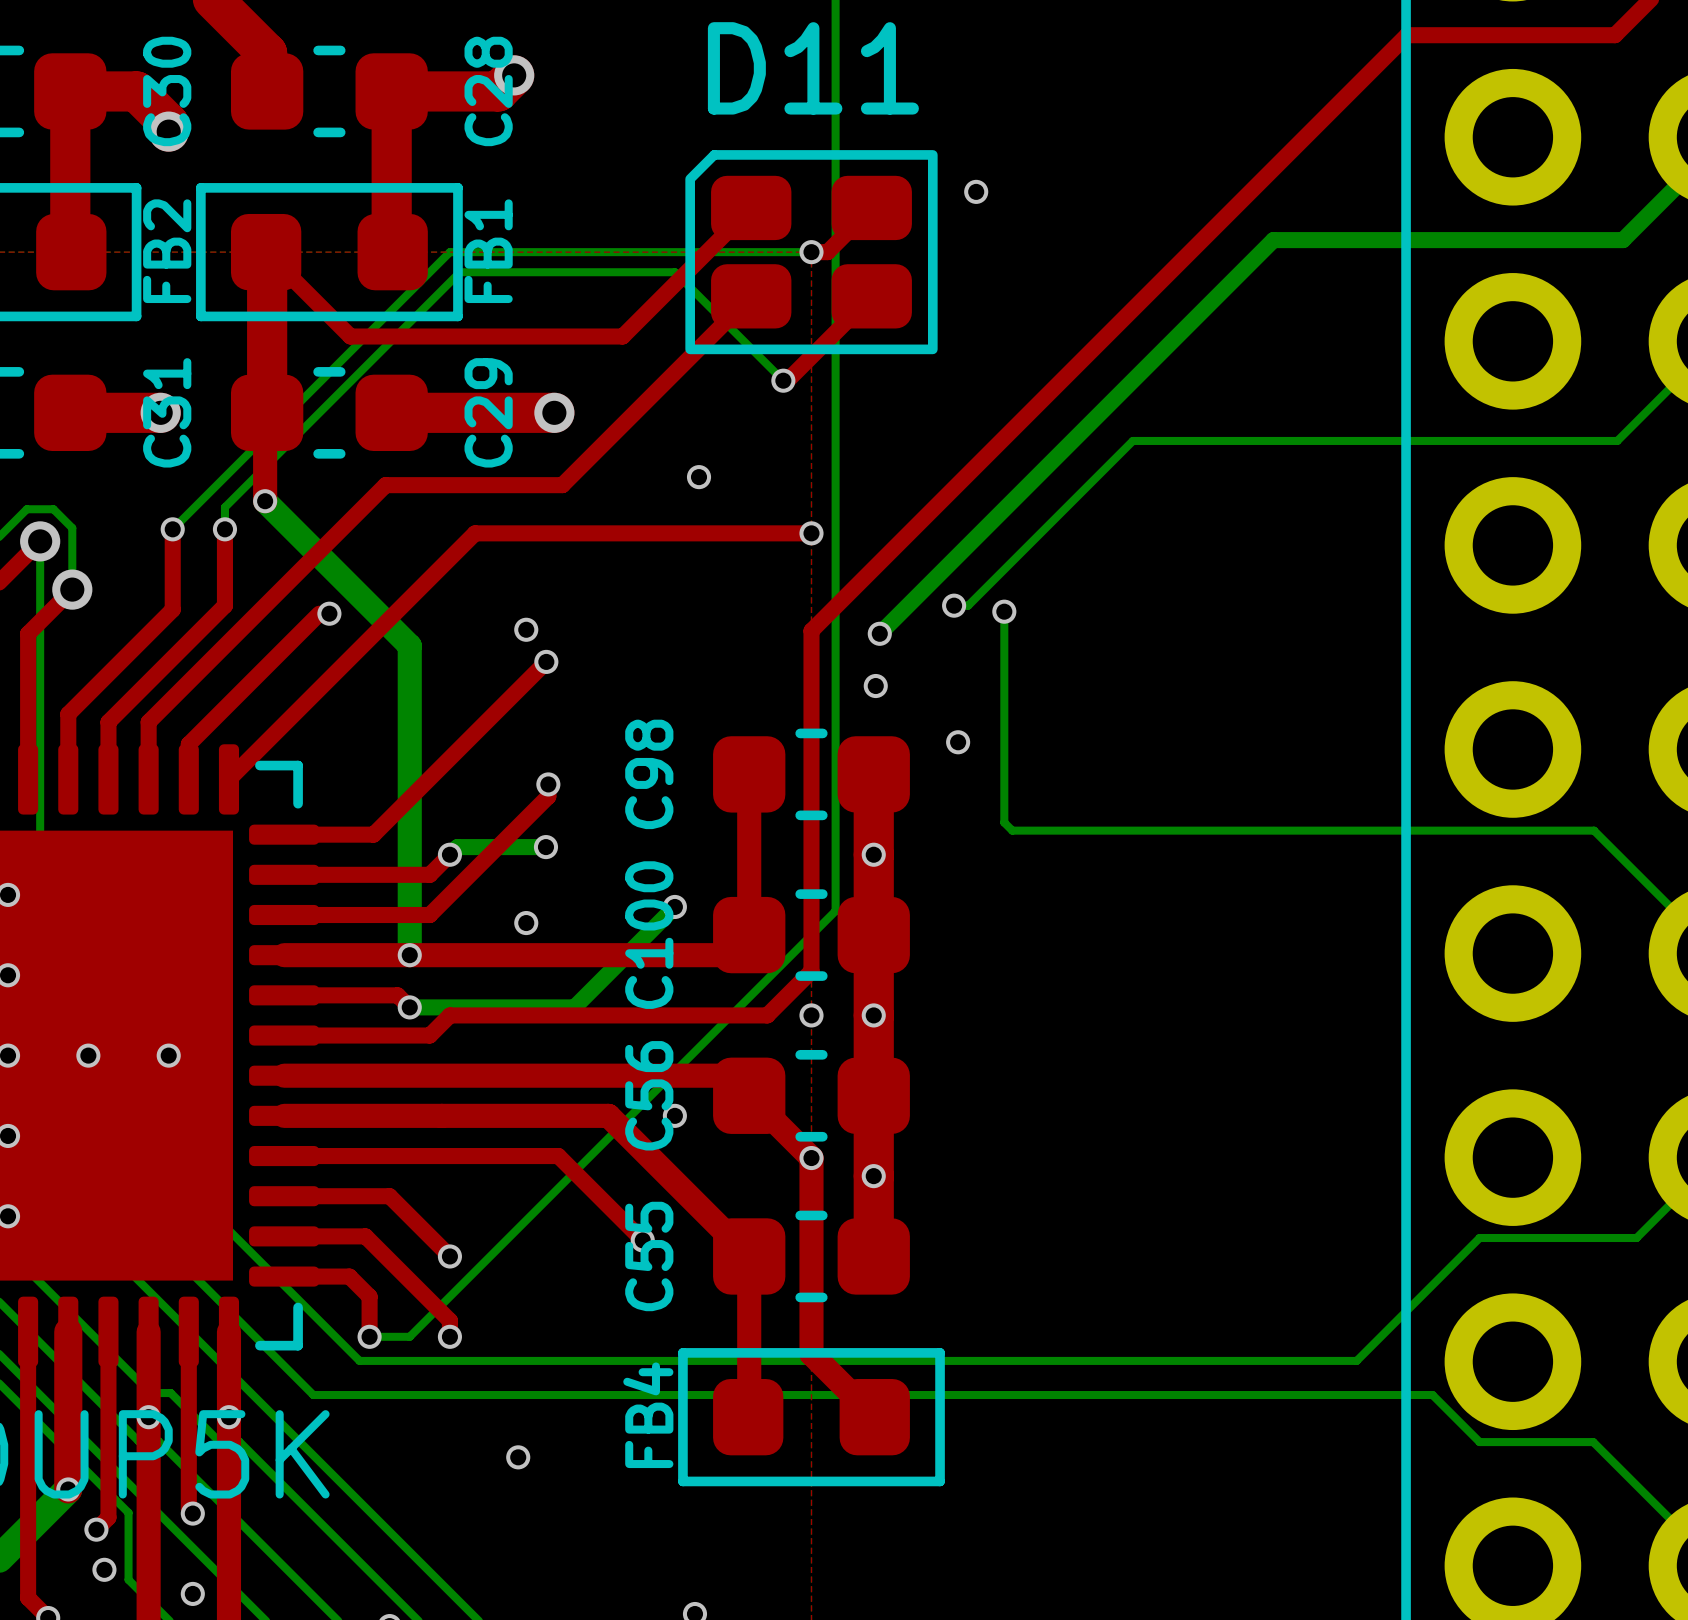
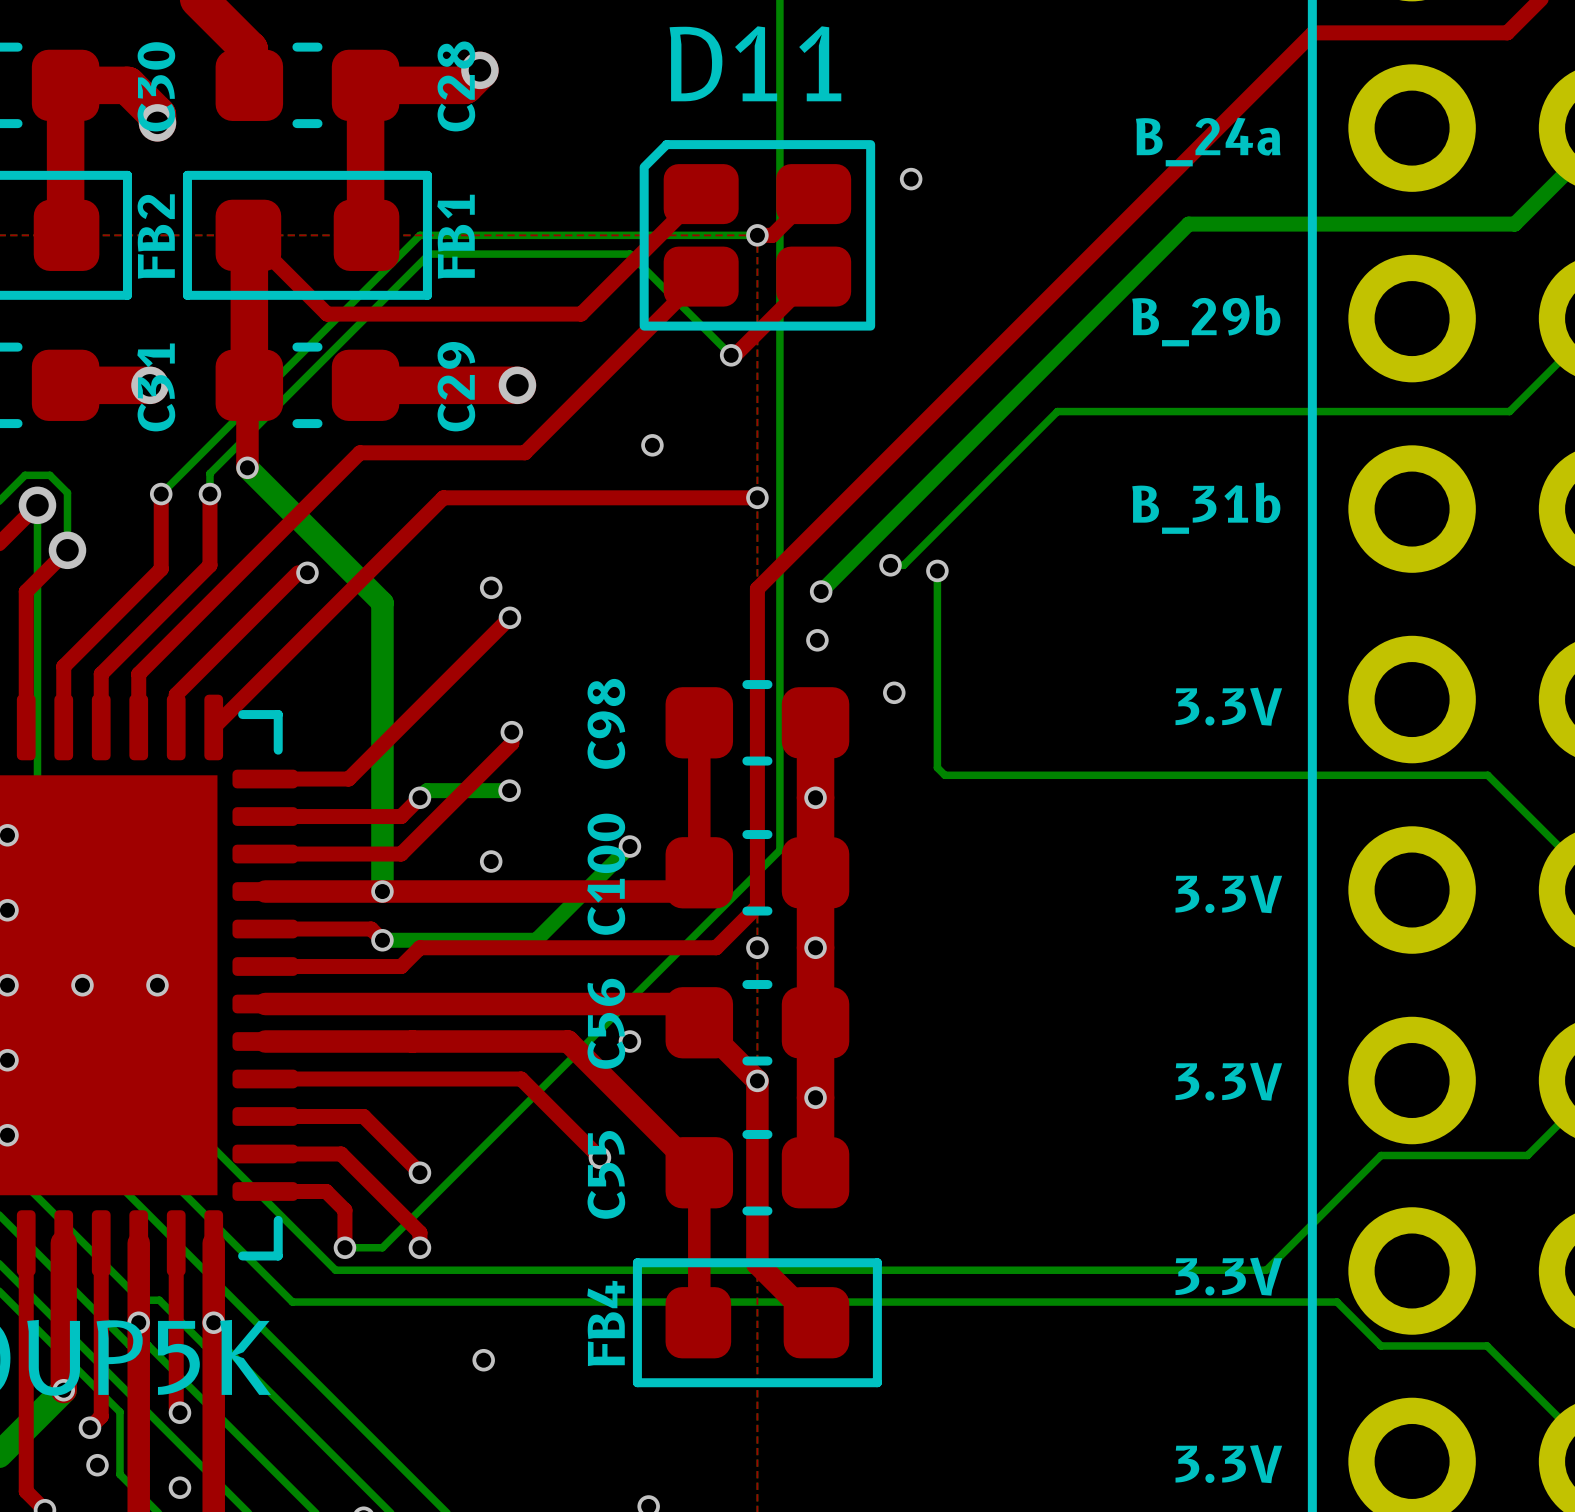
text: none -> B_24a (1208, 142)
text: none -> B_29b (1206, 320)
text: none -> B_31b (1206, 508)
text: none -> 3.3V (1228, 706)
text: none -> 3.3V (1228, 894)
text: none -> 3.3V (1228, 1081)
text: none -> 3.3V (1228, 1276)
text: none -> 3.3V (1228, 1464)

